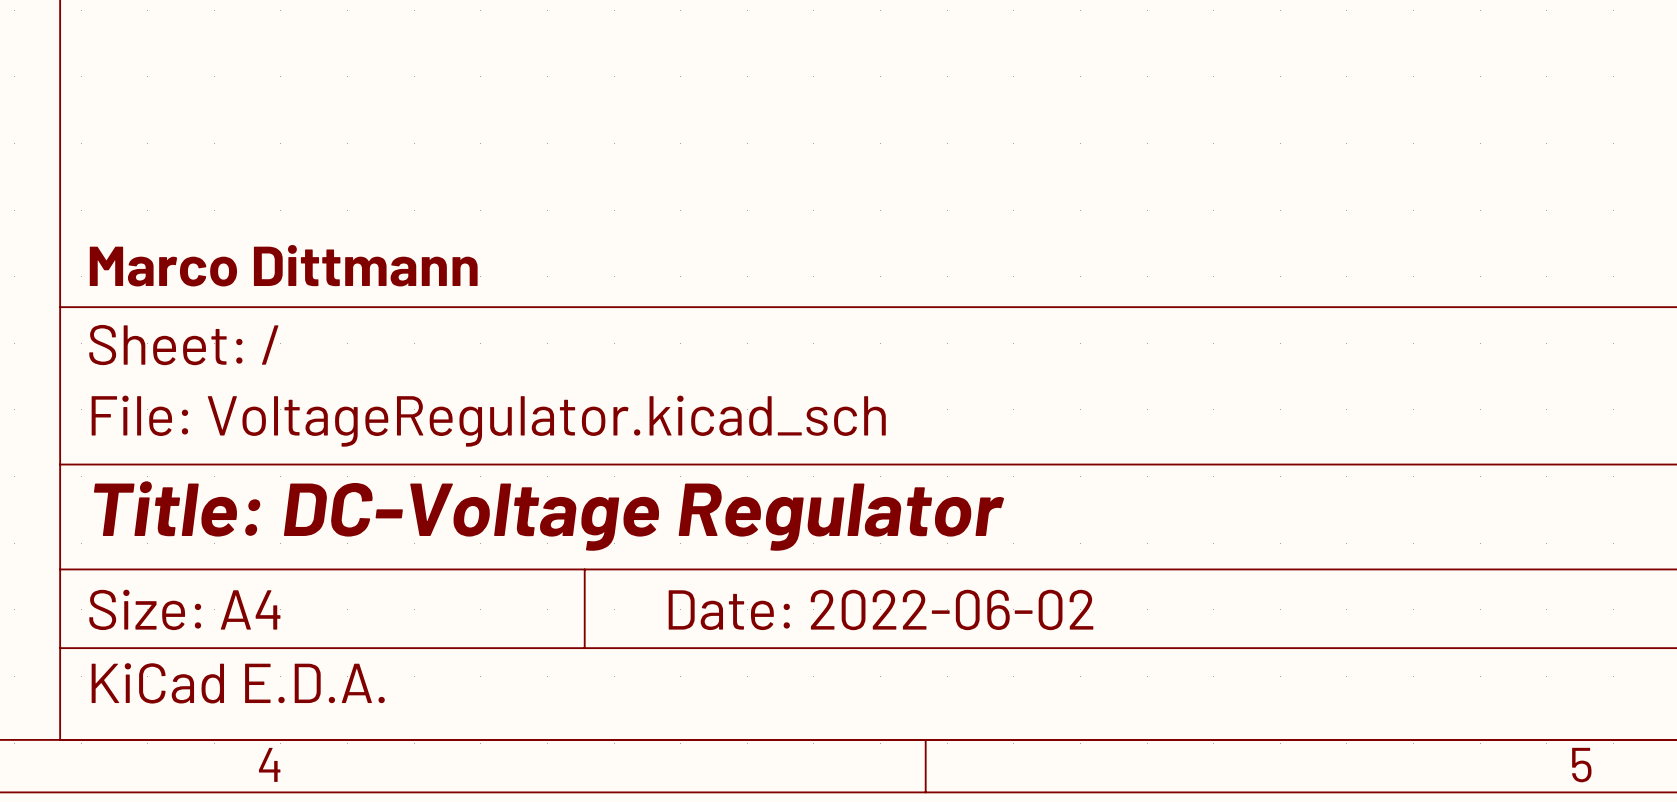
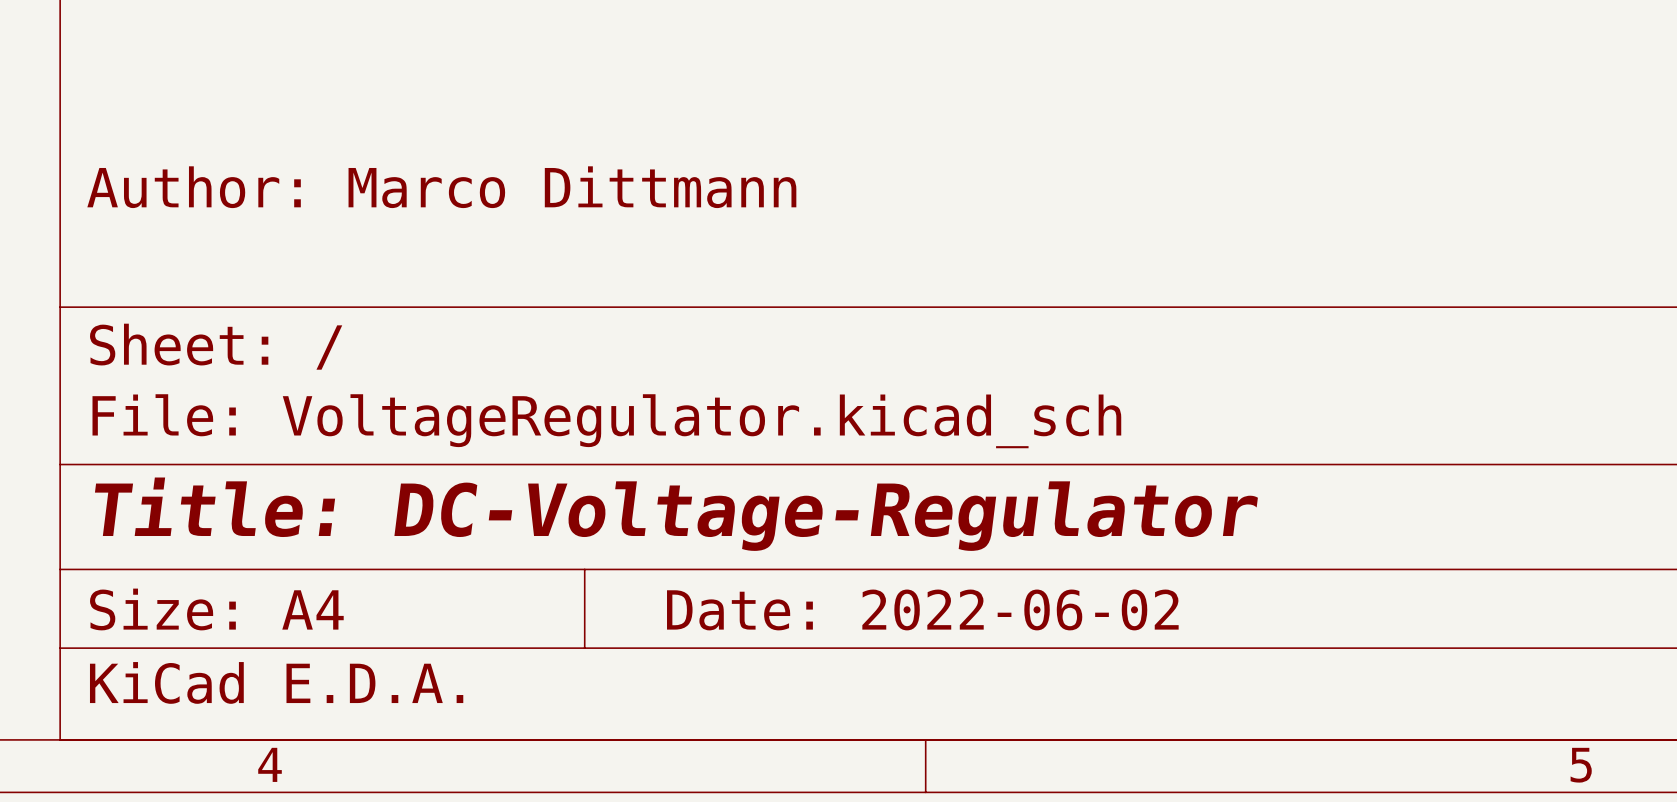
title block: Marco Dittmann (283, 265) -> Author: Marco Dittmann (441, 187)
title block: Title: DC-Voltage Regulator (549, 516) -> Title: DC-Voltage-Regulator (676, 514)

